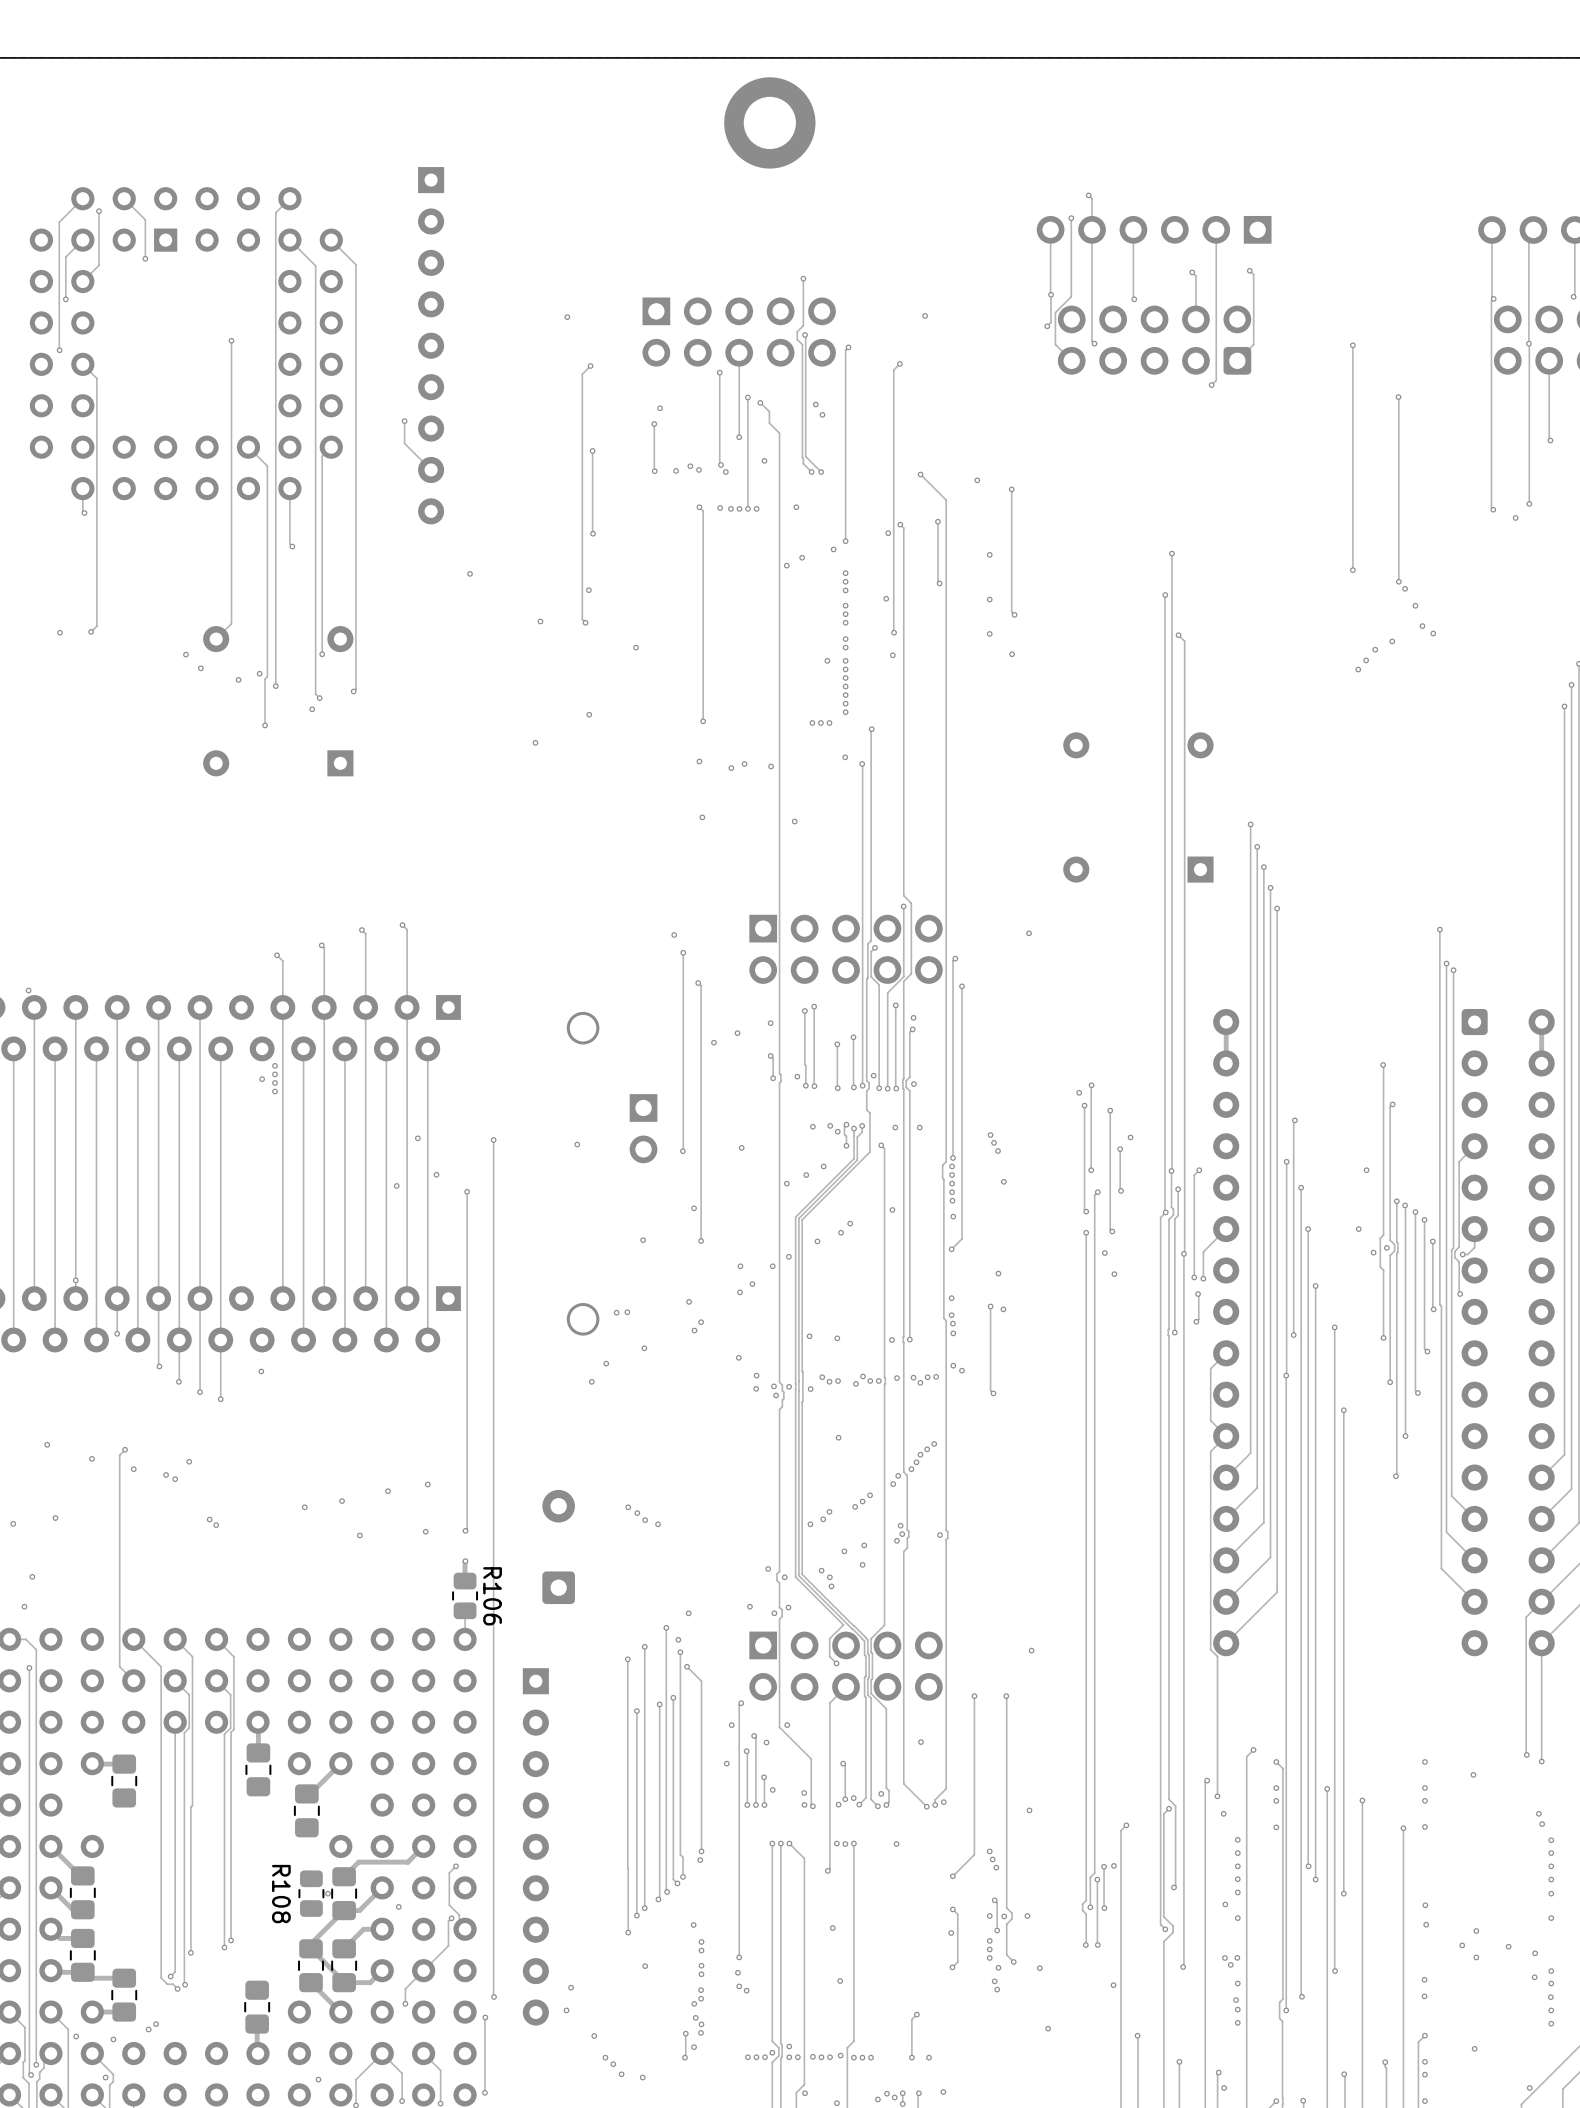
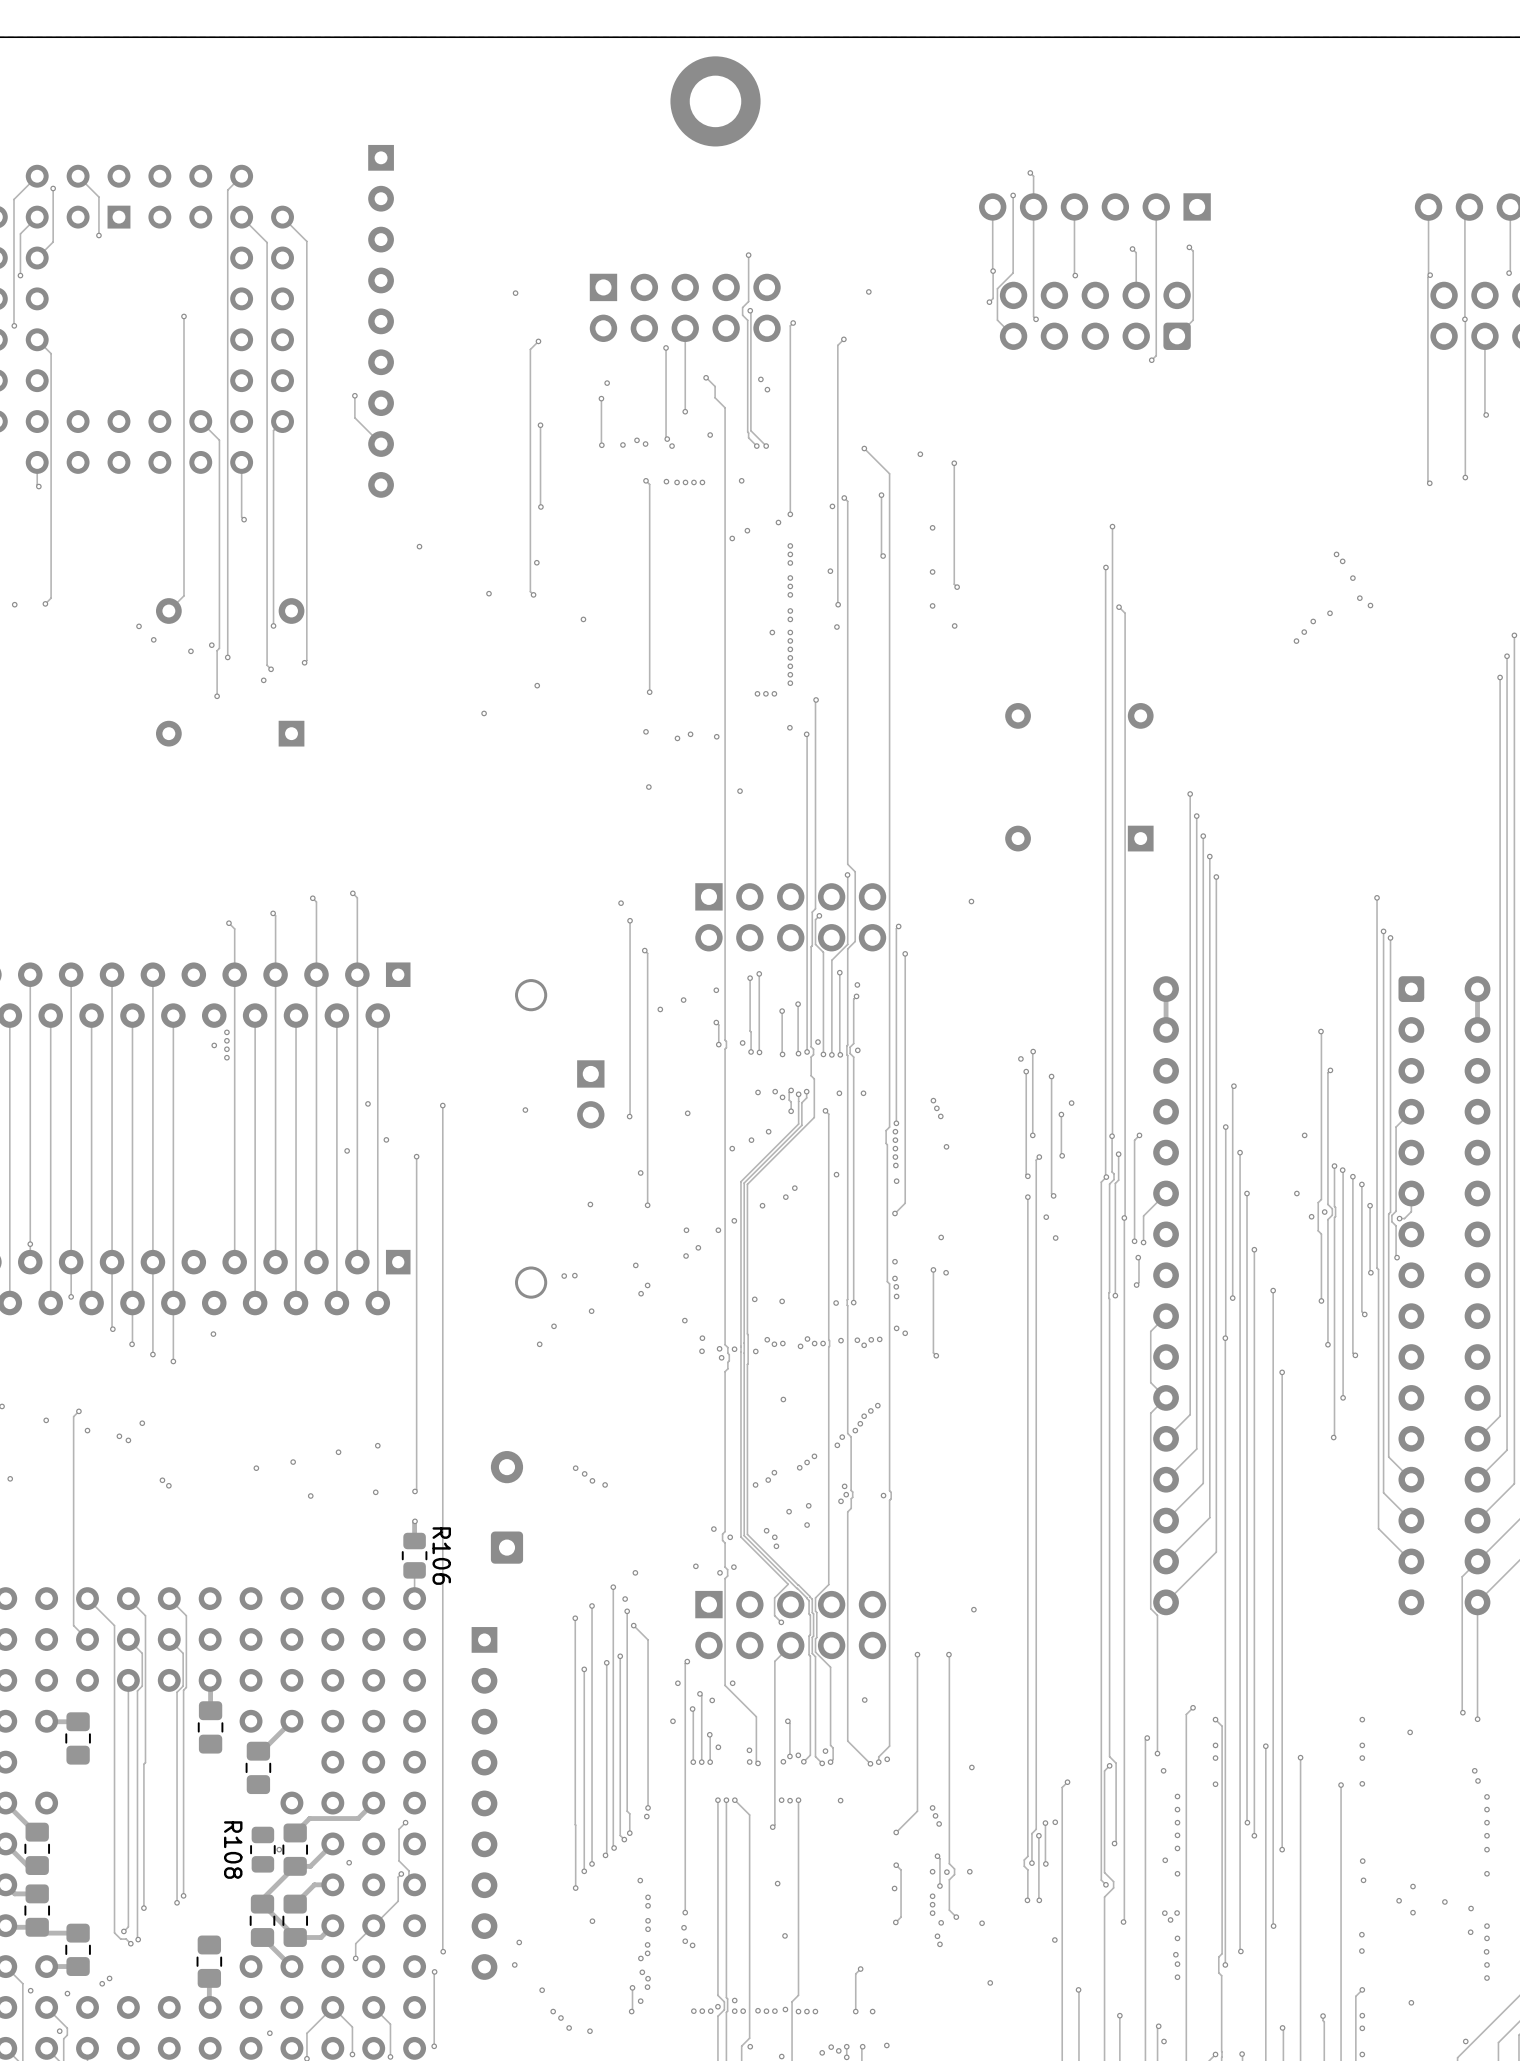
track: (1352, 345) (1352, 570) -> none
via: (1352, 345) -> none
track: (747, 397) (747, 508) -> none
via: (747, 397) -> none
track: (1398, 397) (1398, 581) -> none
via: (1398, 397) -> none
via: (1515, 517) -> none
via: (1352, 570) -> none

